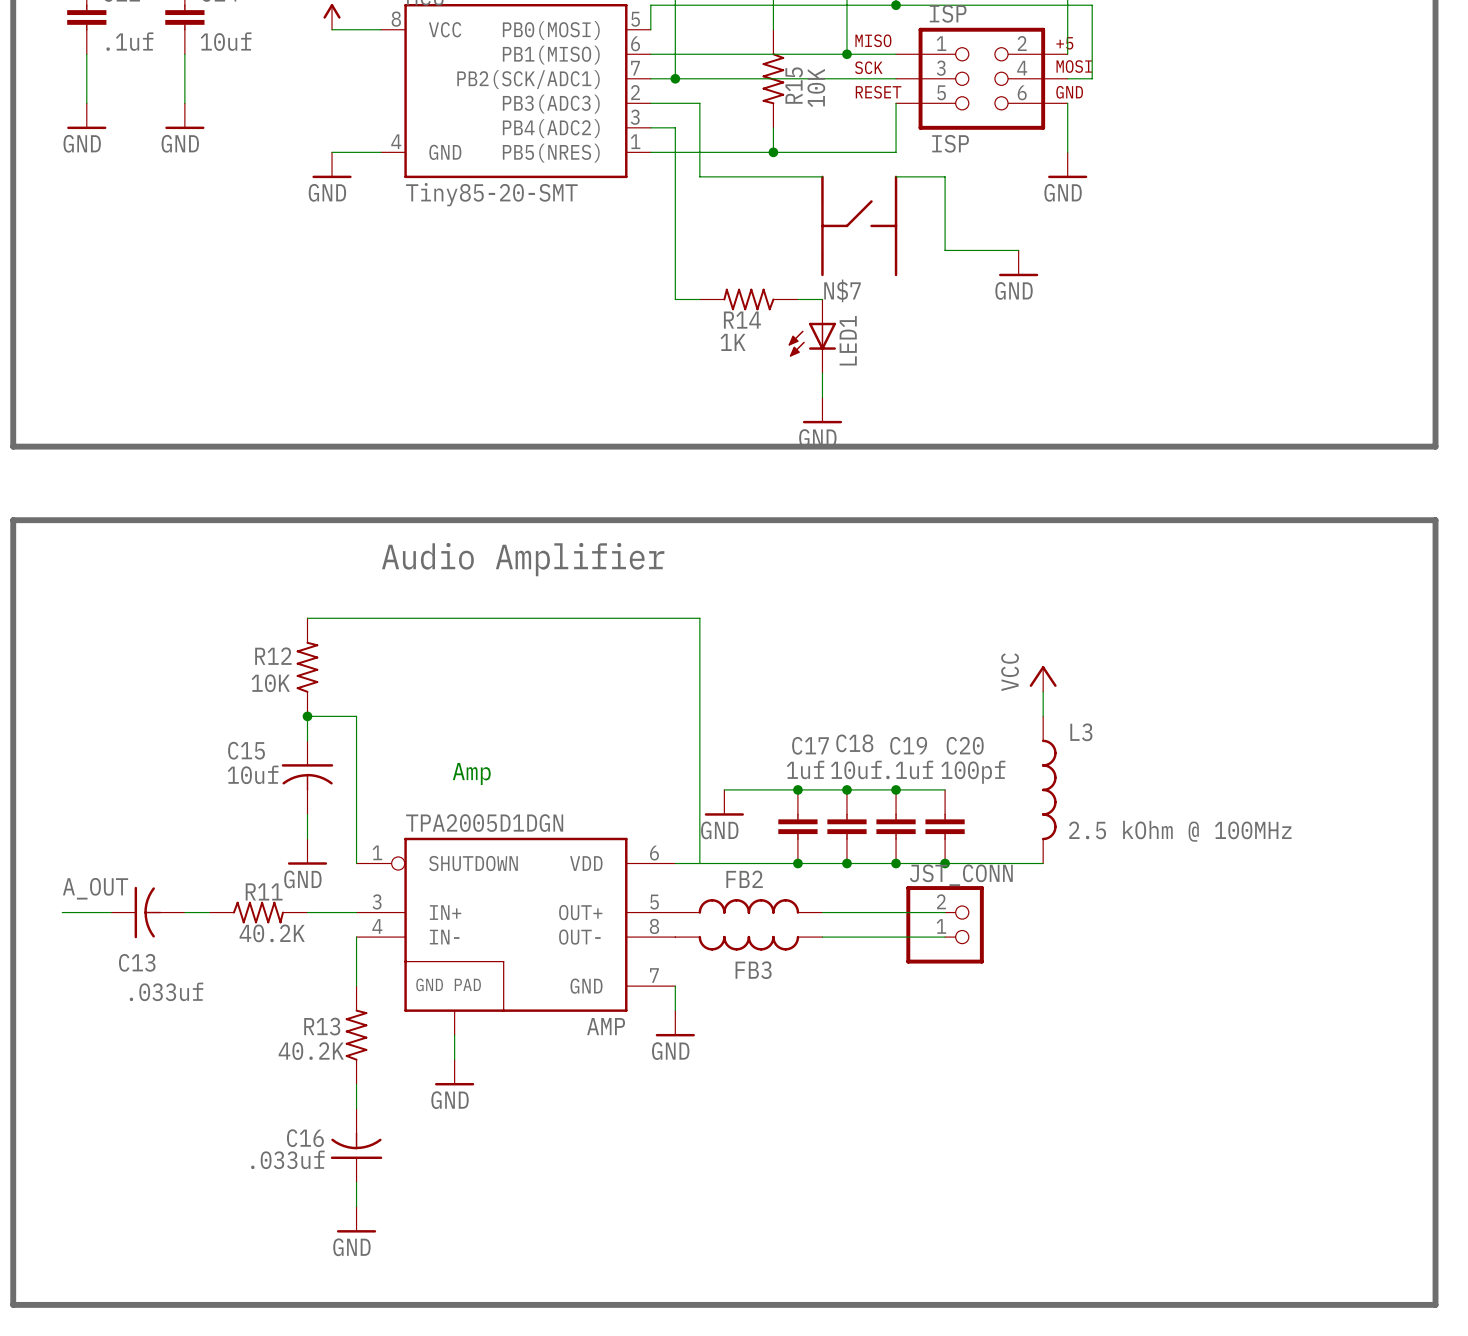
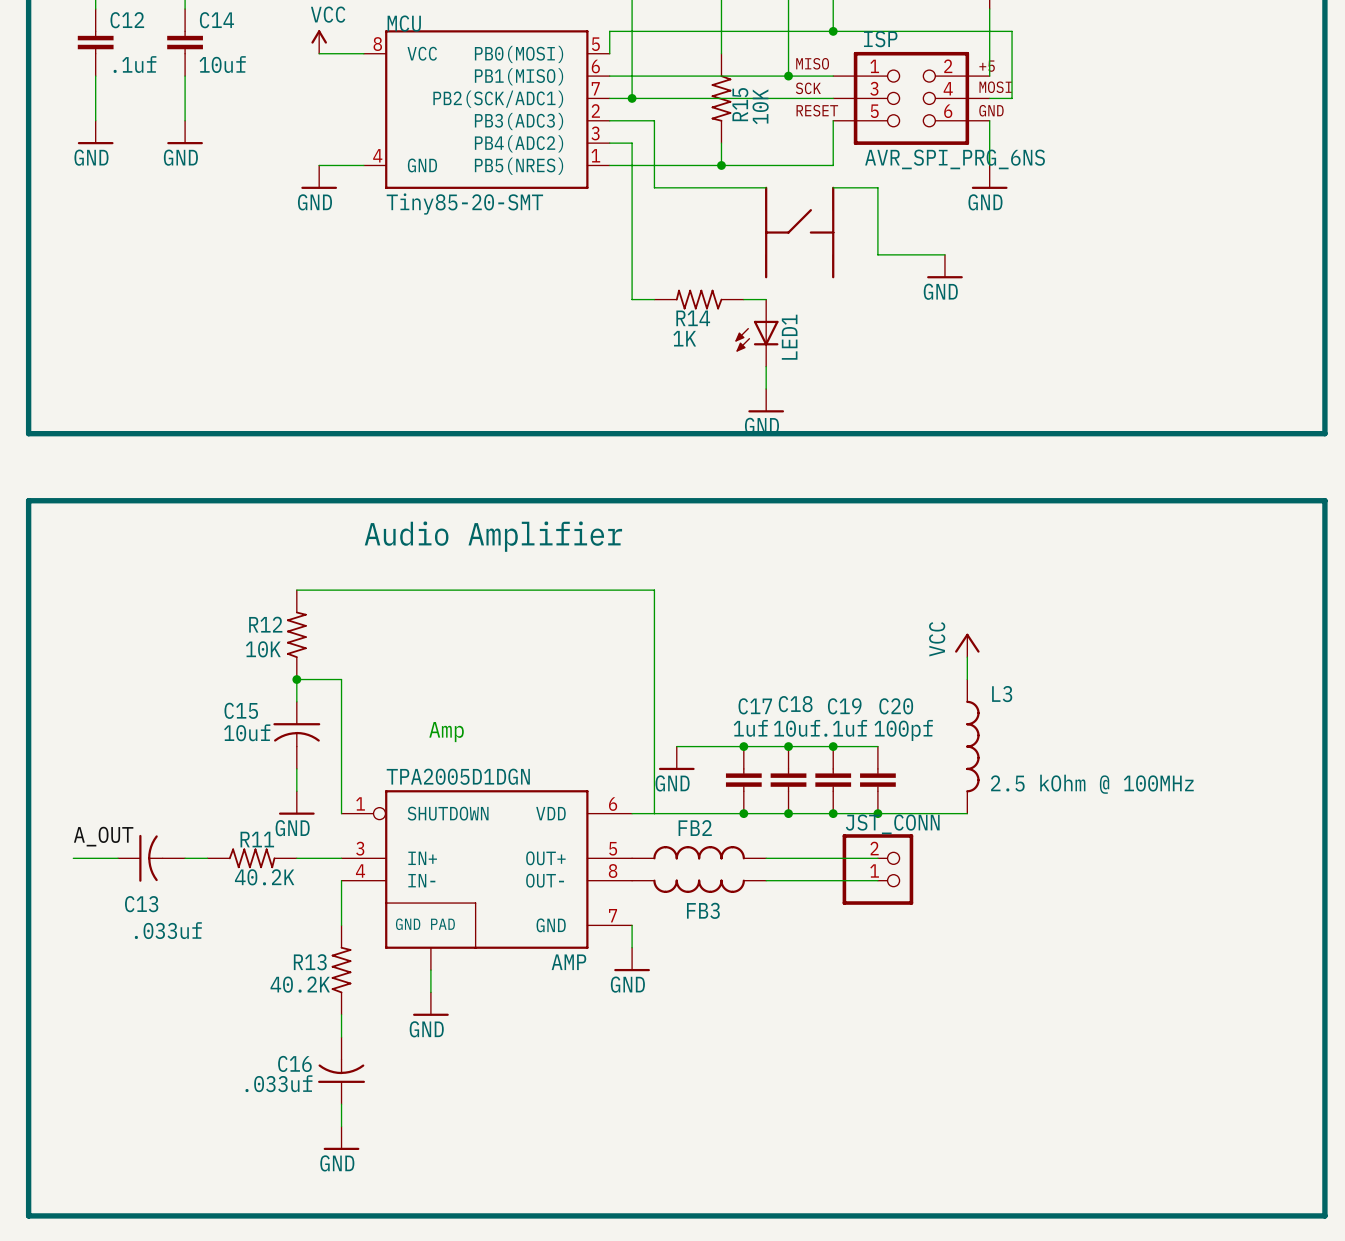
ISP value: ISP (950, 143) -> AVR_SPI_PRG_6NS (955, 159)
label: N$7 (842, 290) -> none

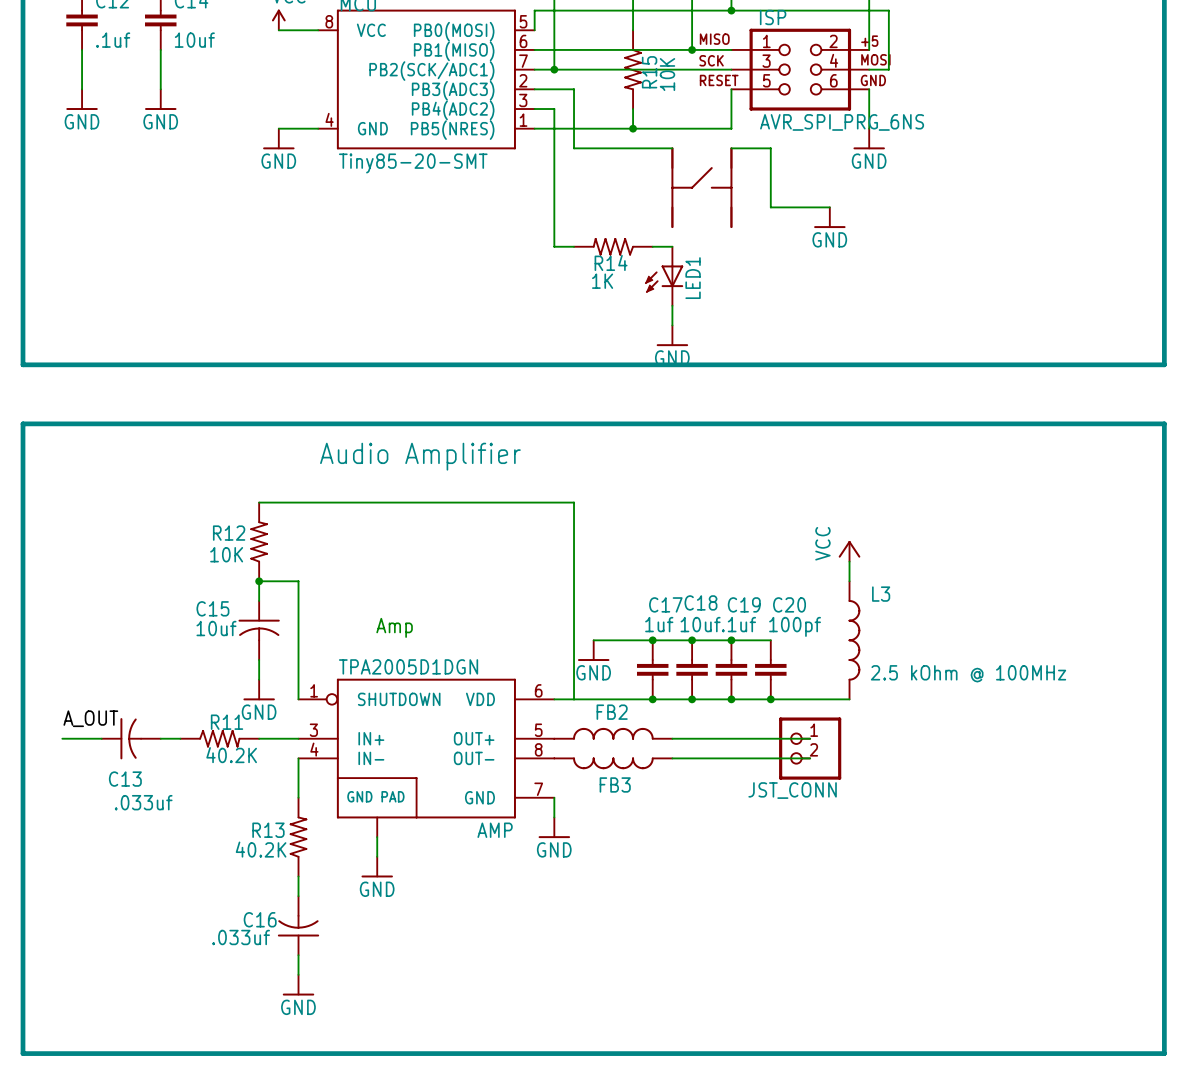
wire: none -> (770, 738) (810, 738)
JST_CONN rotation: 0° (877, 869) -> 180° (810, 748)
JST_CONN position: (877, 869) -> (810, 748)
wire: none -> (770, 758) (810, 758)

